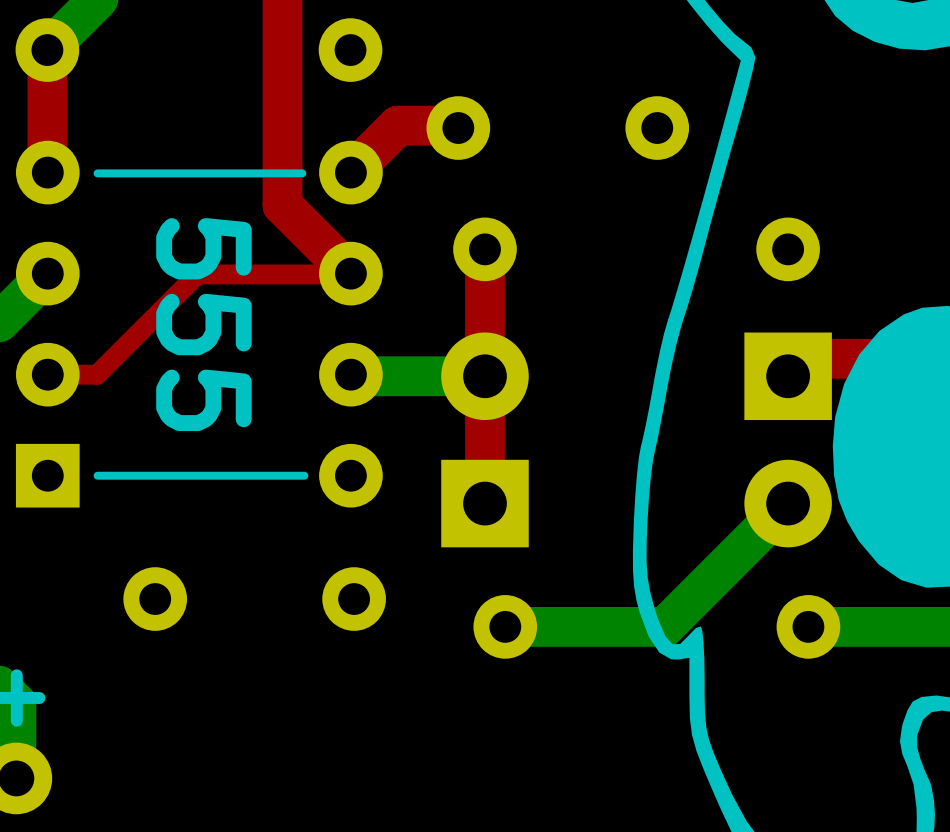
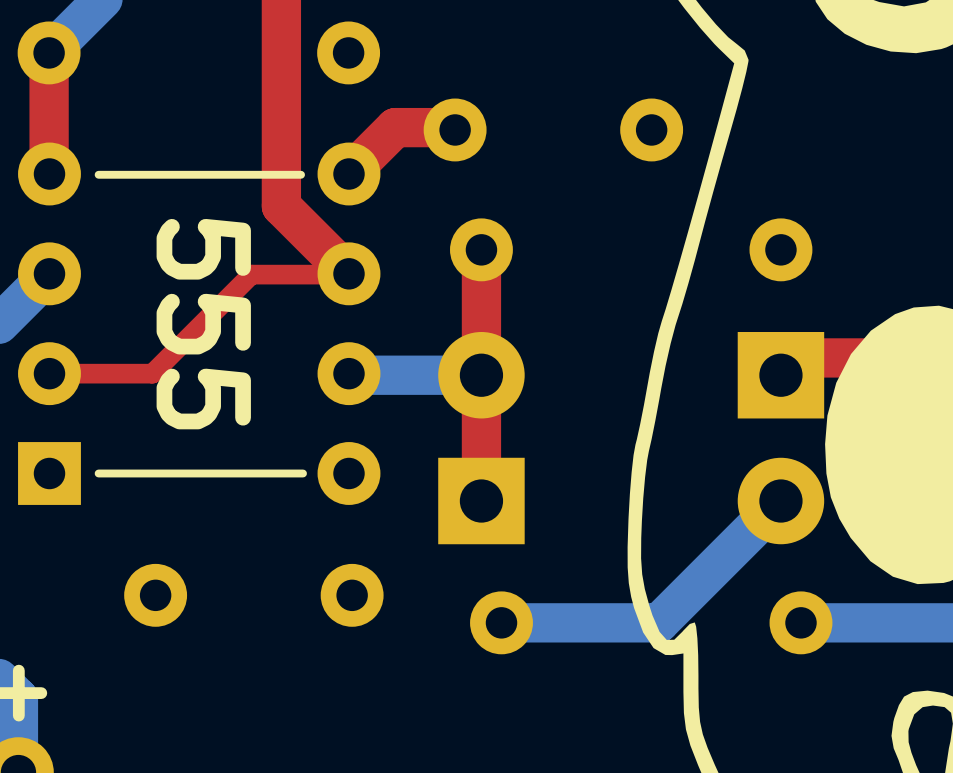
top track: (252, 274) (197, 274) (97, 374) -> (251, 274) (152, 373) (98, 373)

